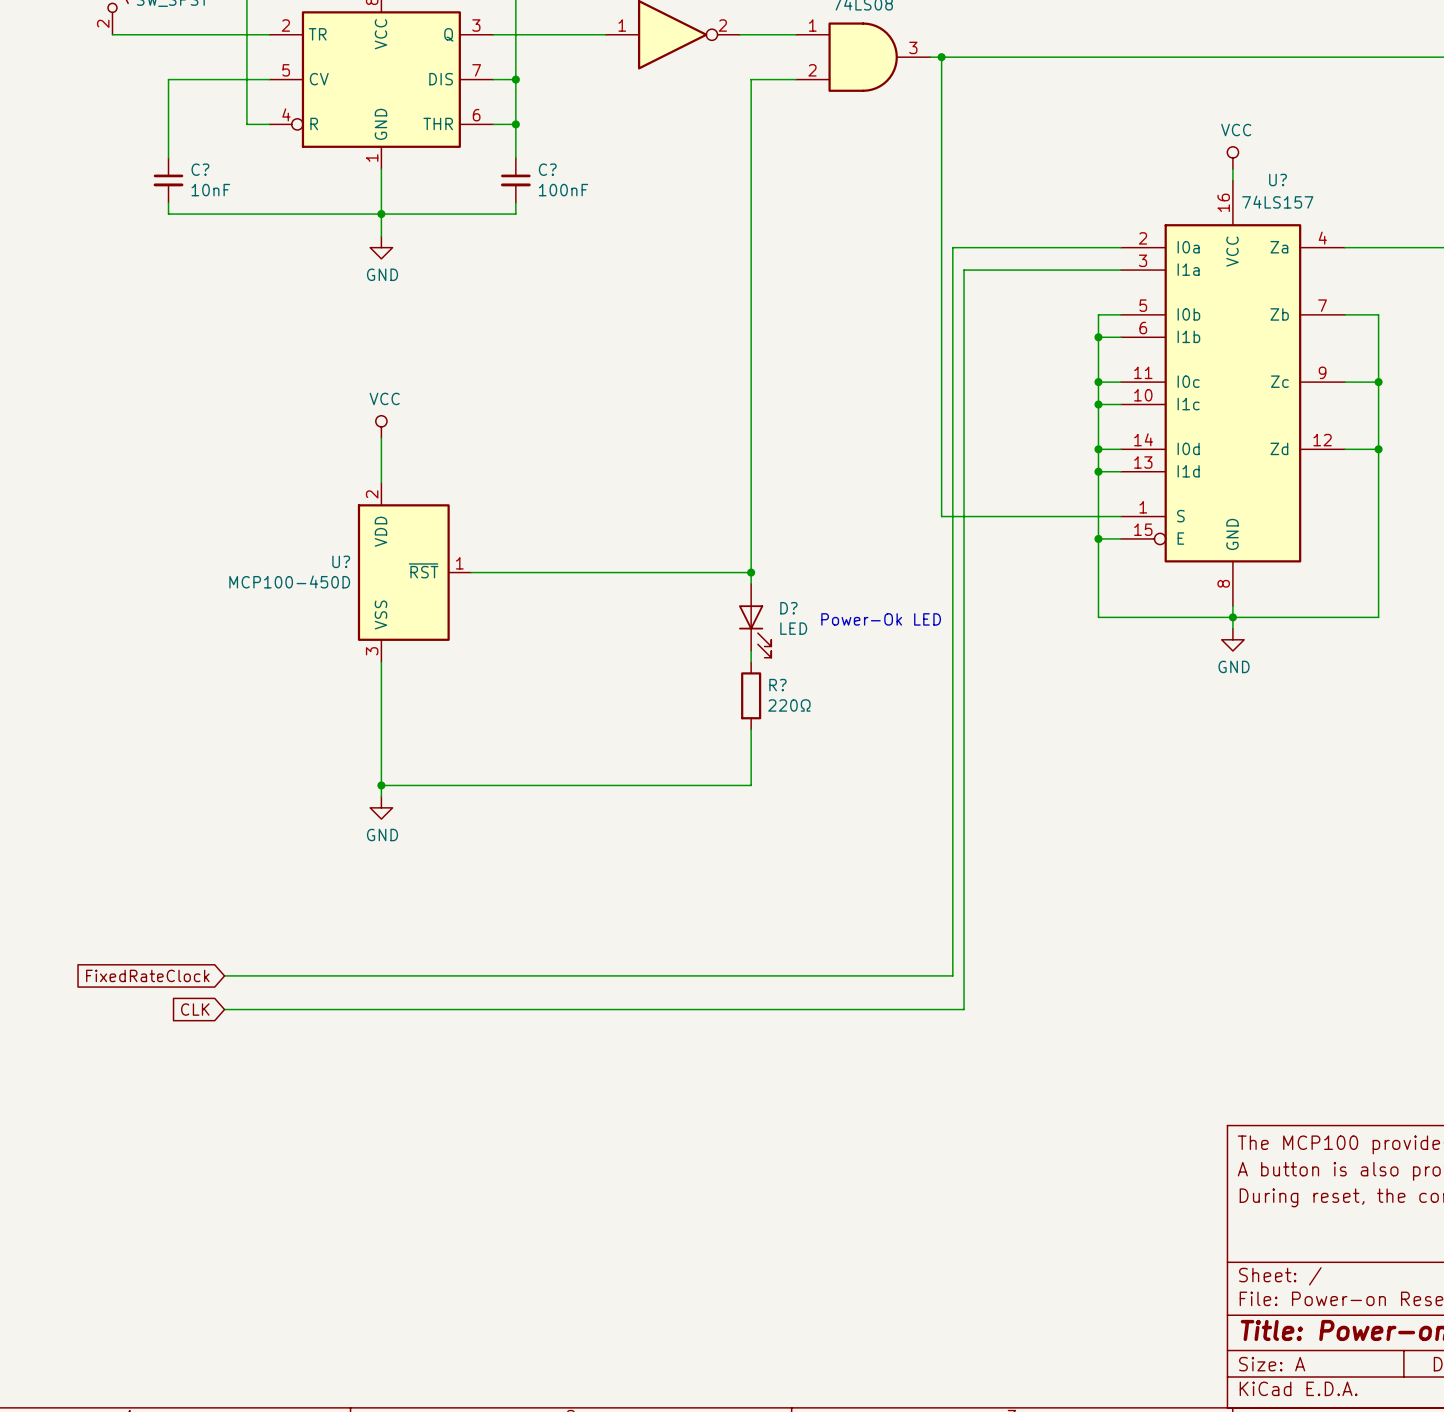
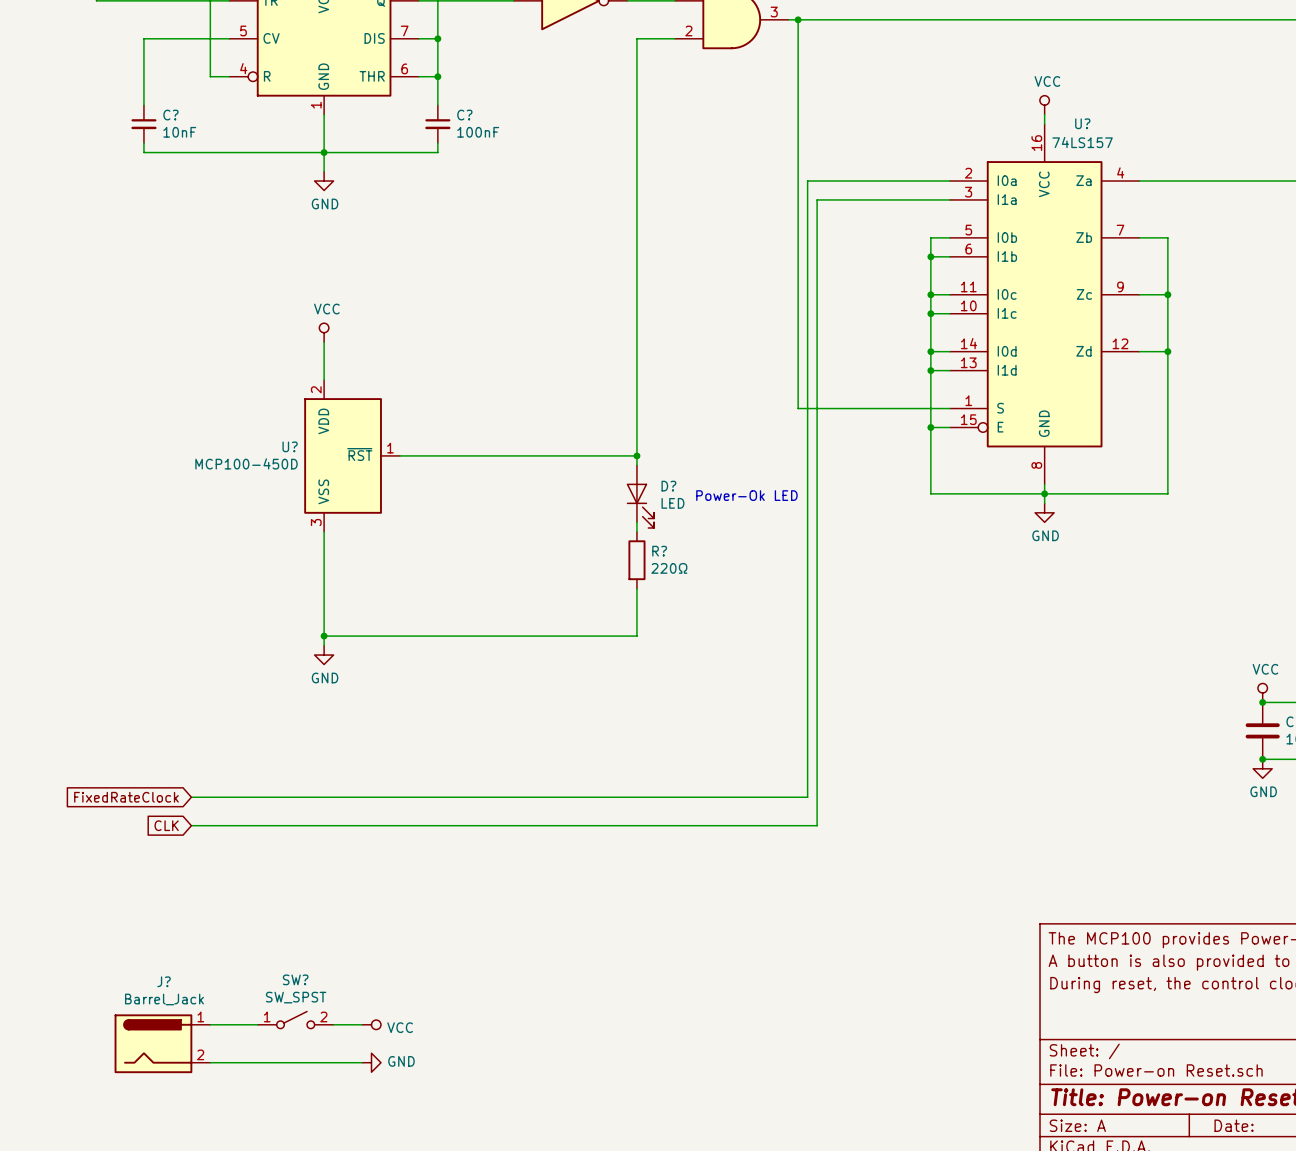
SW?: none -> SW_SPST (295, 1020)
wire: none -> (210, 1024) (257, 1024)
wire: none -> (333, 1024) (362, 1024)
power symbol: none -> VCC (371, 1024)
J?: none -> Barrel_Jack (162, 1043)
wire: none -> (210, 1062) (362, 1062)
power symbol: none -> GND (371, 1062)

